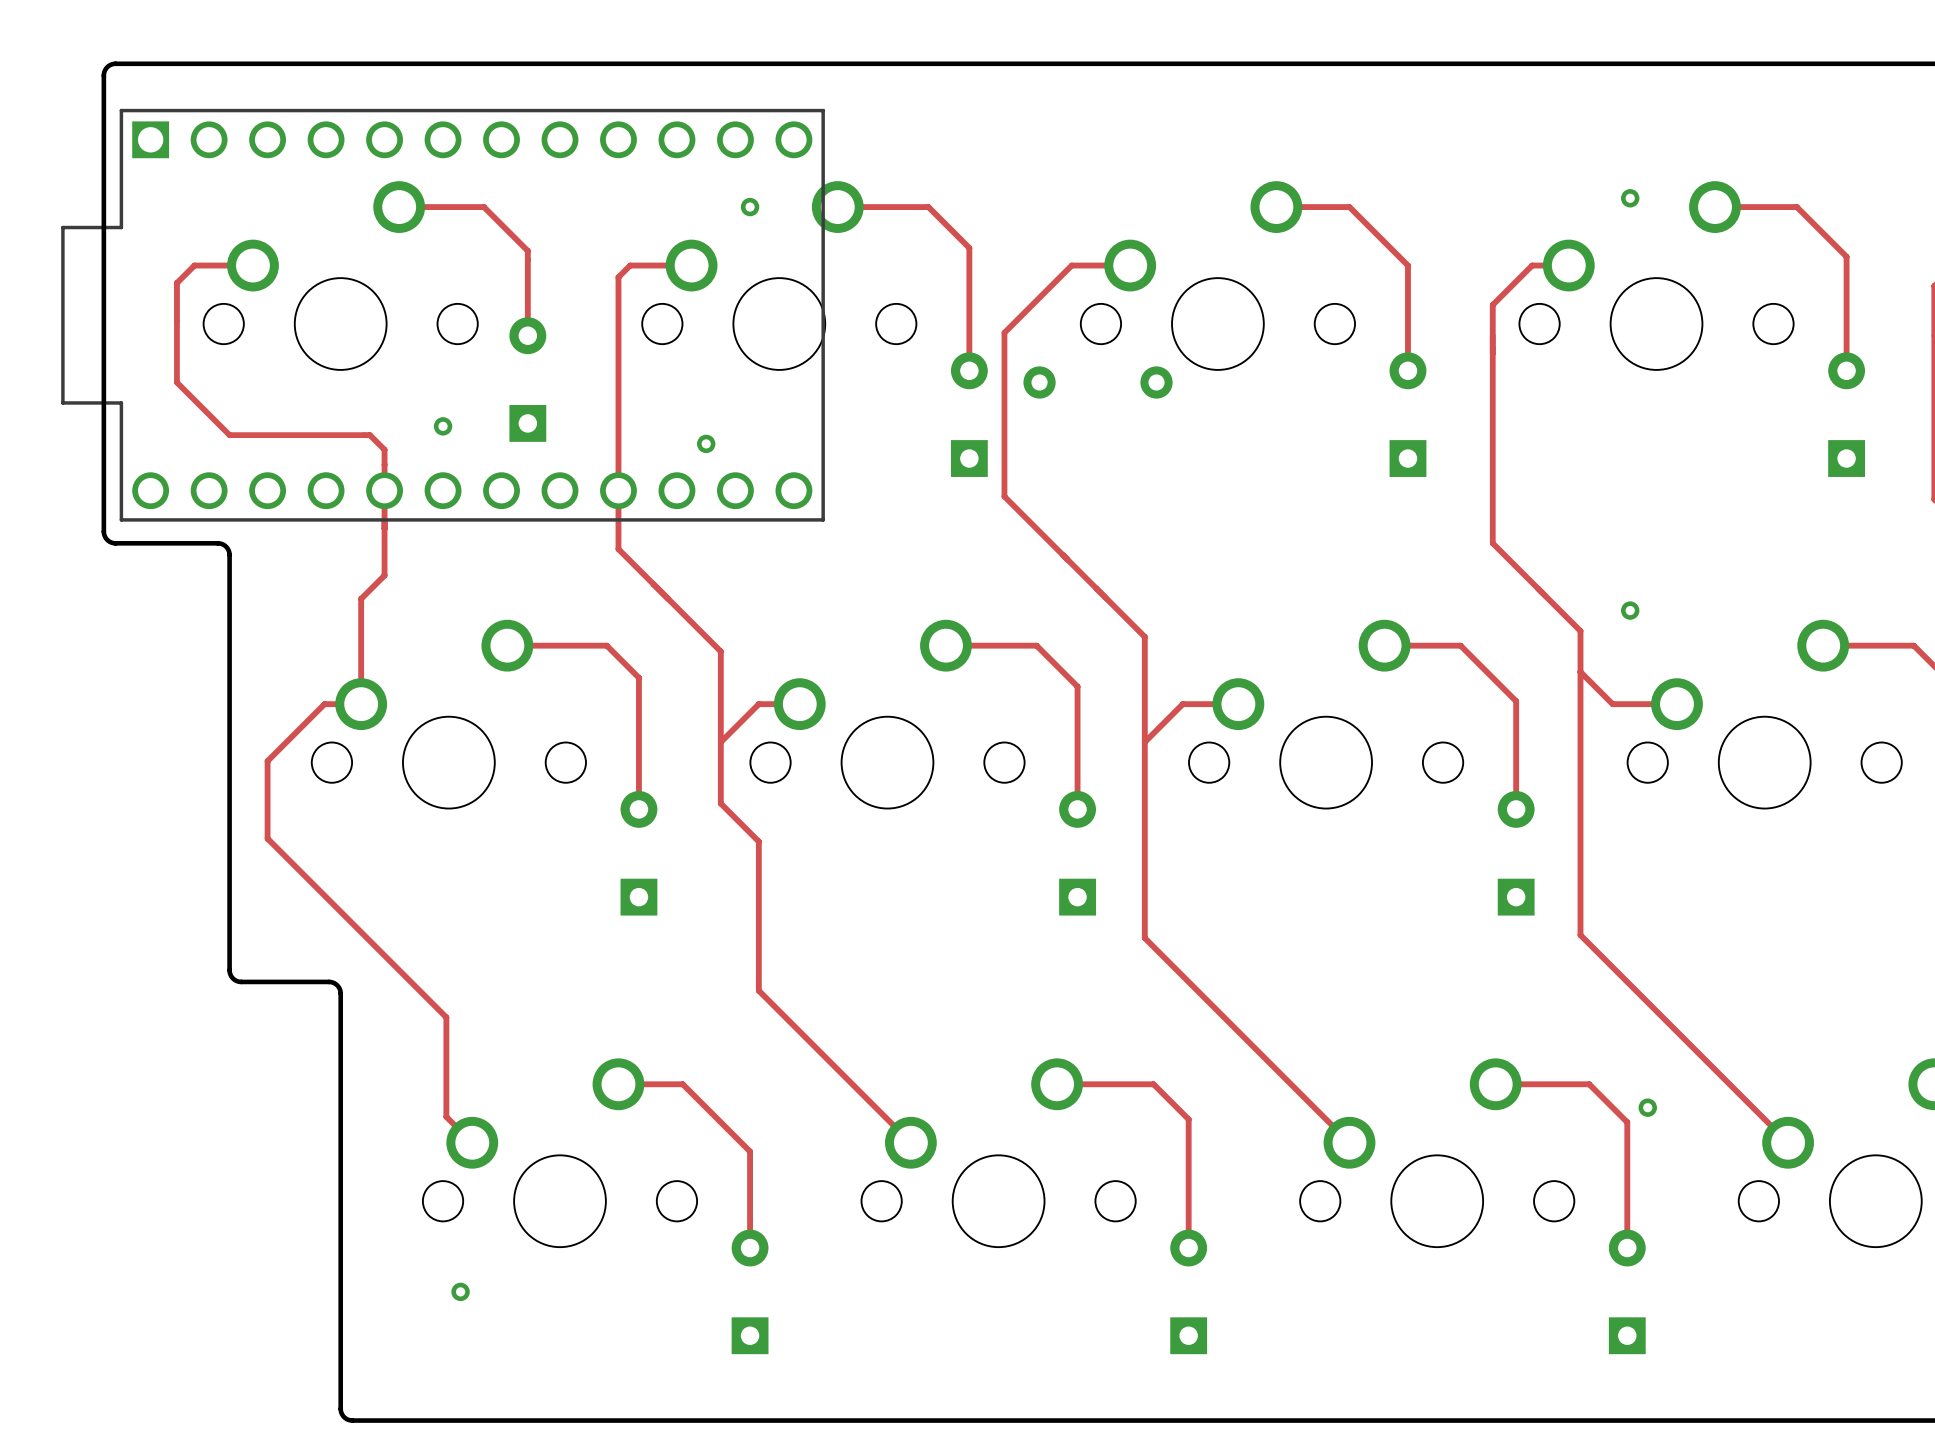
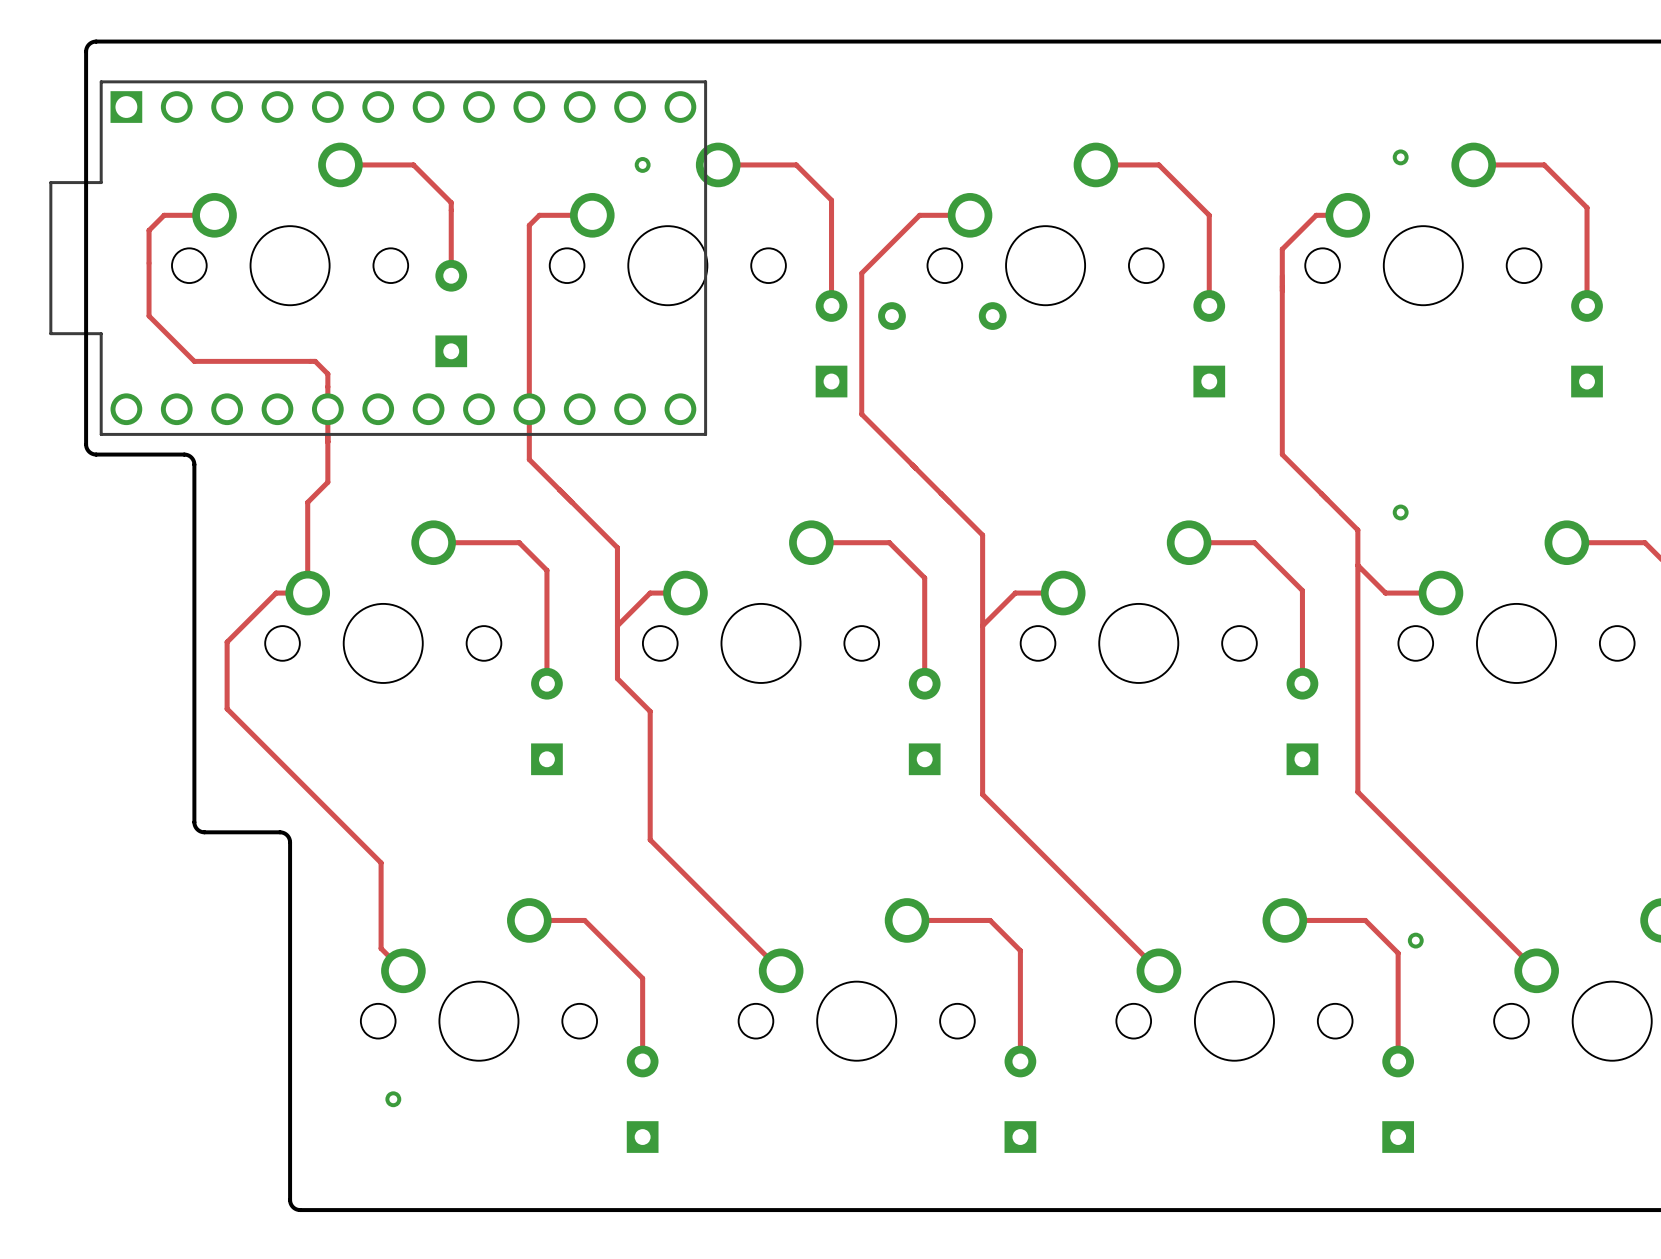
via: (443, 426) -> none
via: (706, 443) -> none

